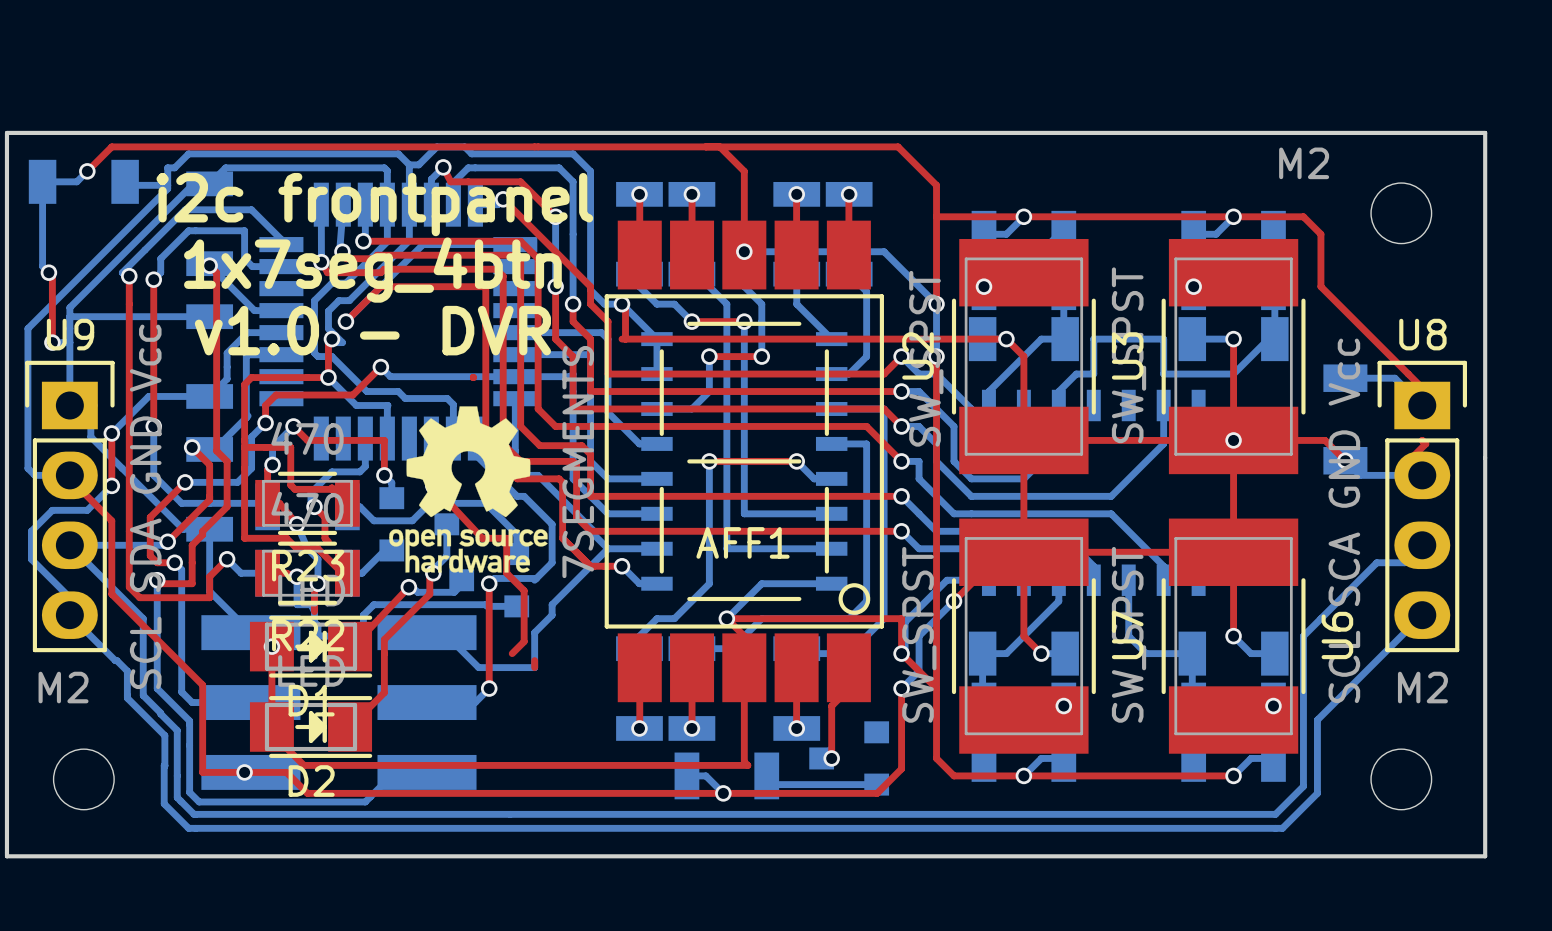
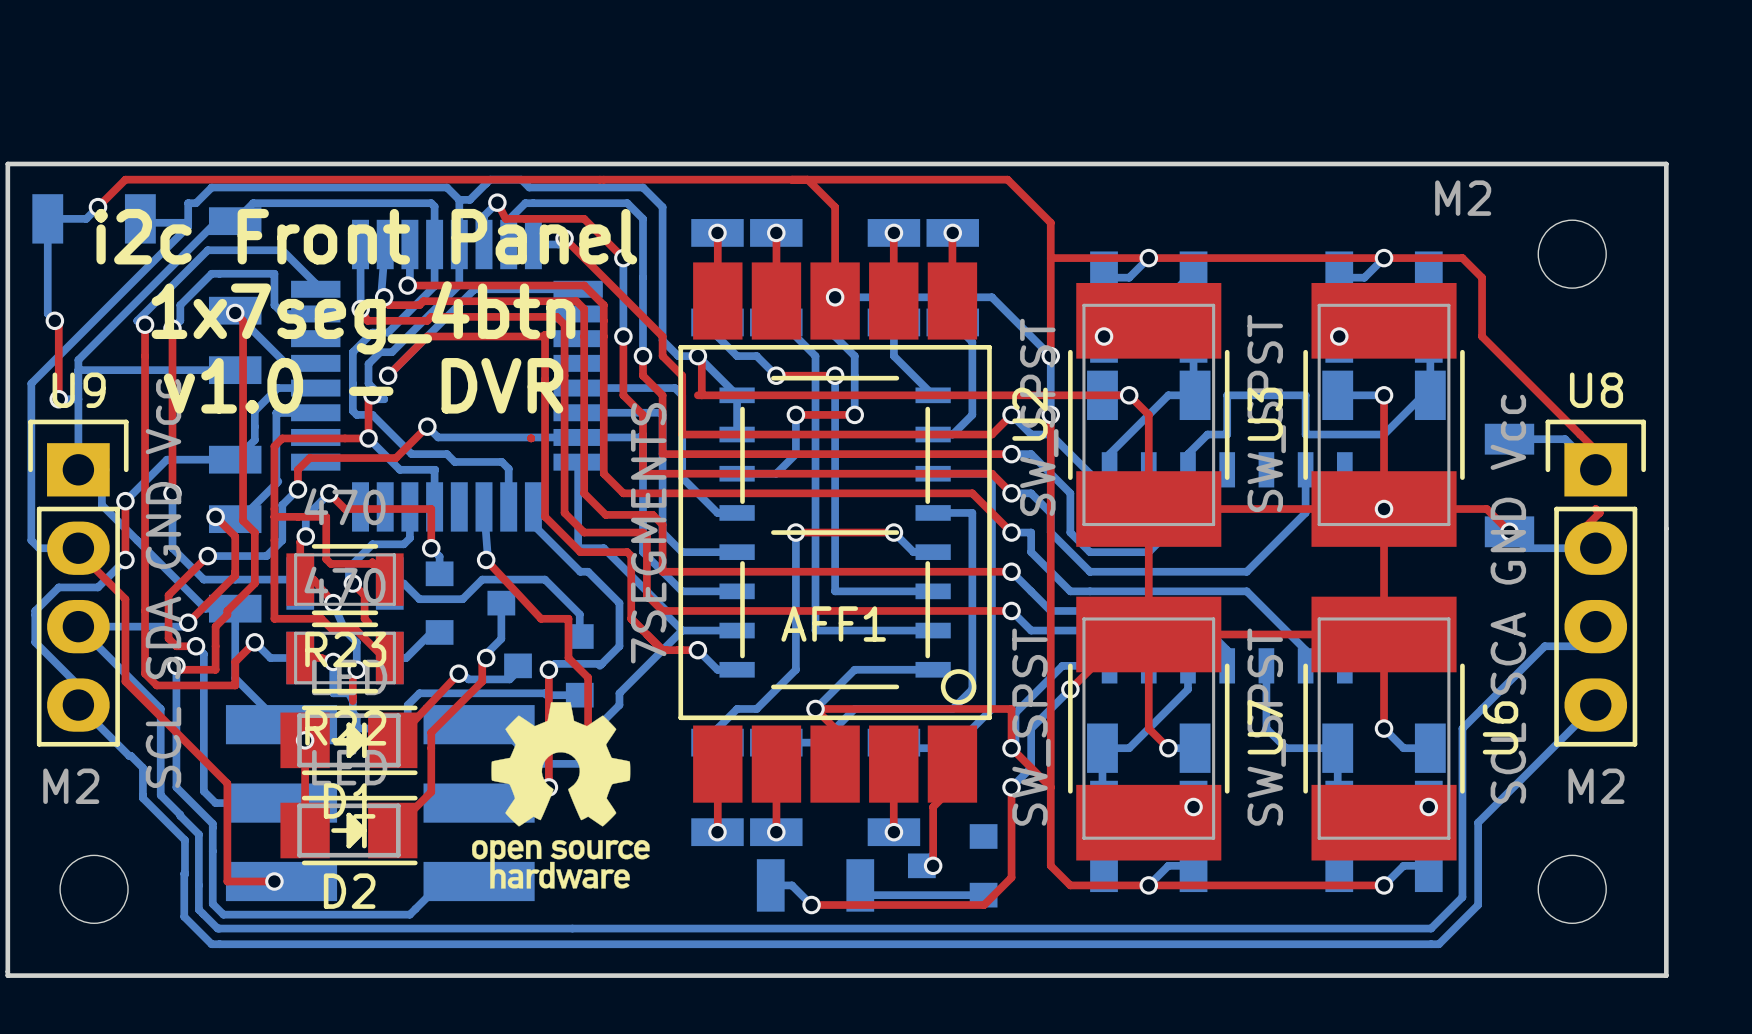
text: i2c frontpanel (374, 204) -> i2c Front Panel (365, 236)
text position: 1x7seg_4btn (372, 270) -> 1x7seg_4btn (363, 317)
text position: v1.0 - DVR (372, 330) -> v1.0 - DVR (363, 385)
drawing position: (468, 489) -> (560, 795)
top track: (744, 667) (744, 761) (747, 765) (304, 765) (271, 733) (271, 727) -> none
top track: (244, 772) (286, 772) (307, 793) (723, 793) -> none

